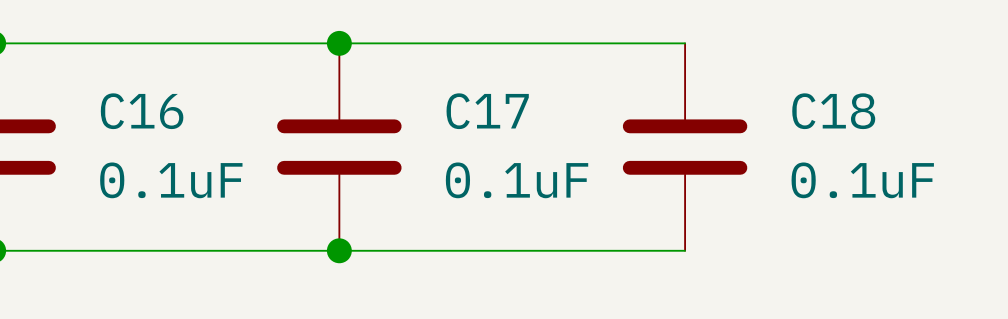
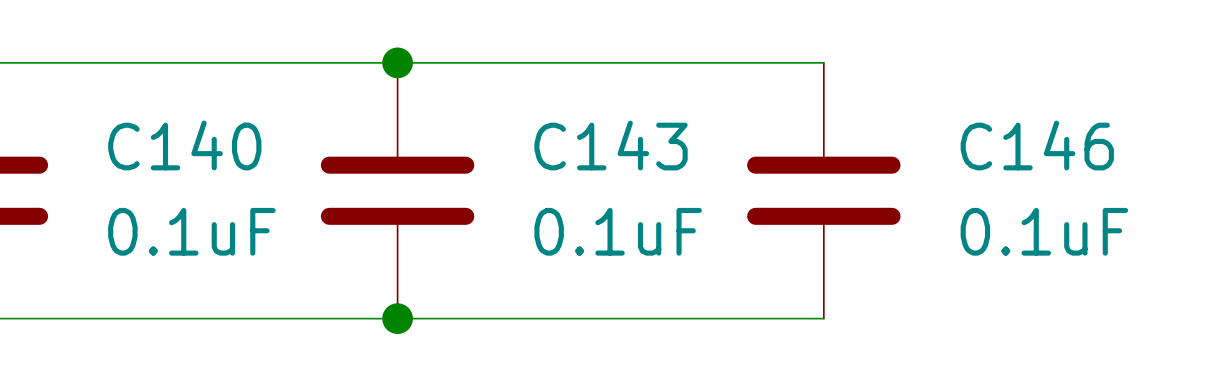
C16 name: C16 (142, 111) -> C140 (184, 145)
C17 name: C17 (487, 111) -> C143 (611, 145)
C18 name: C18 (833, 111) -> C146 (1037, 145)

